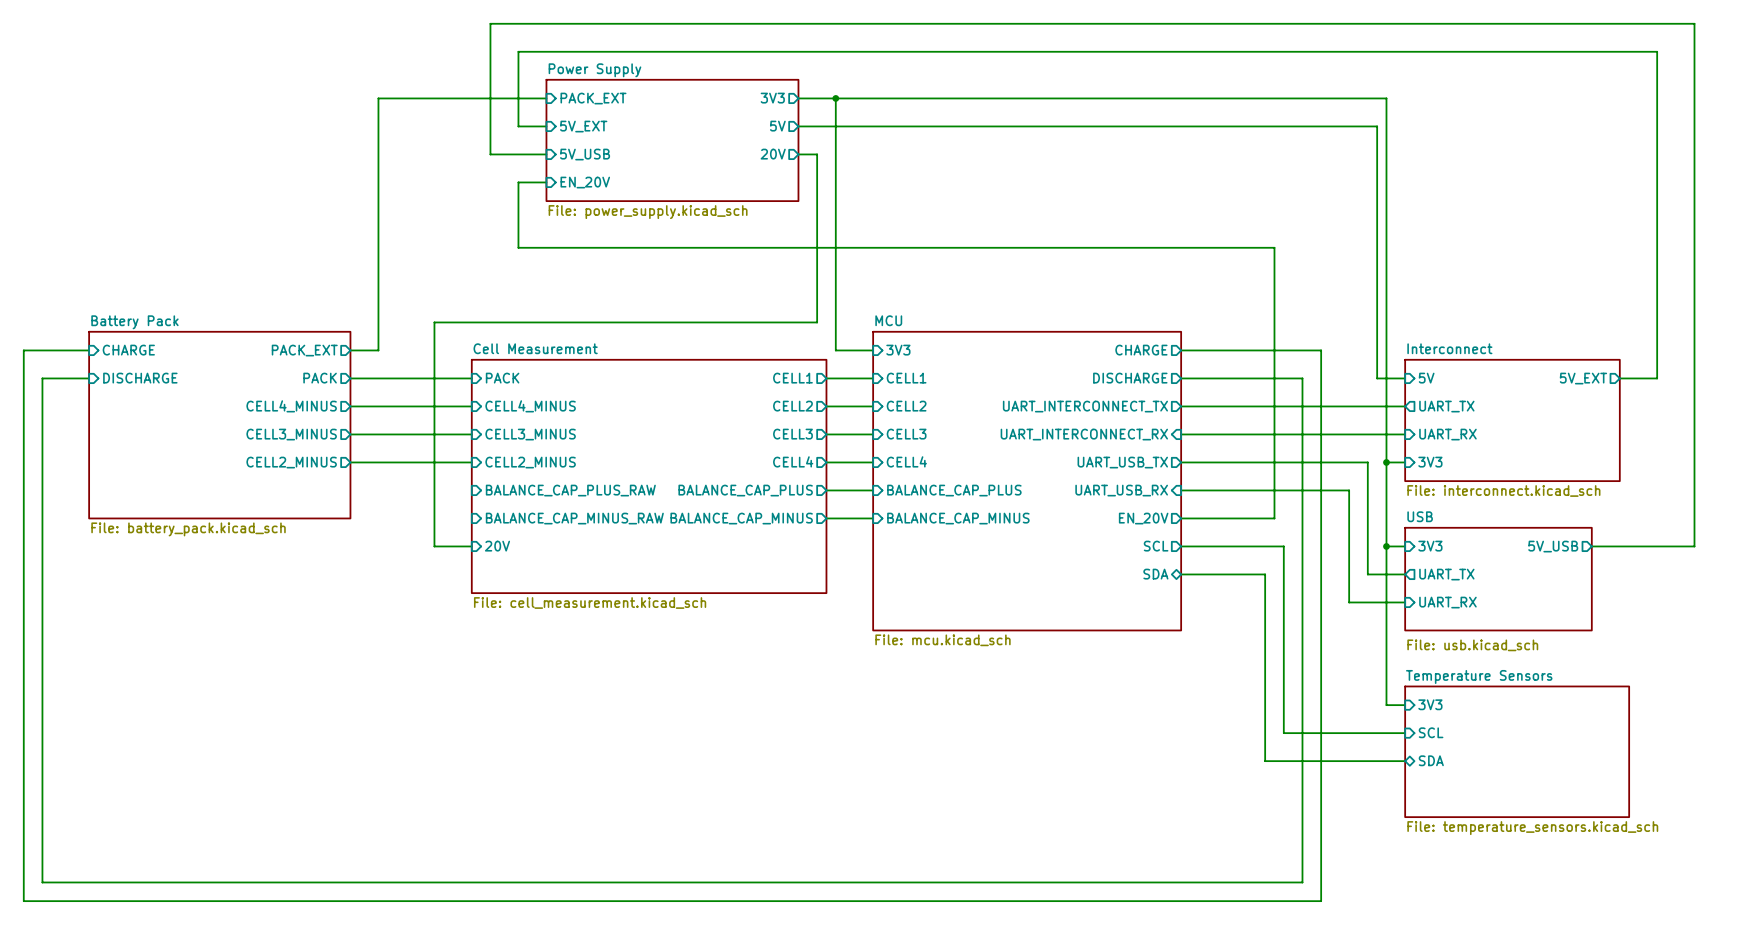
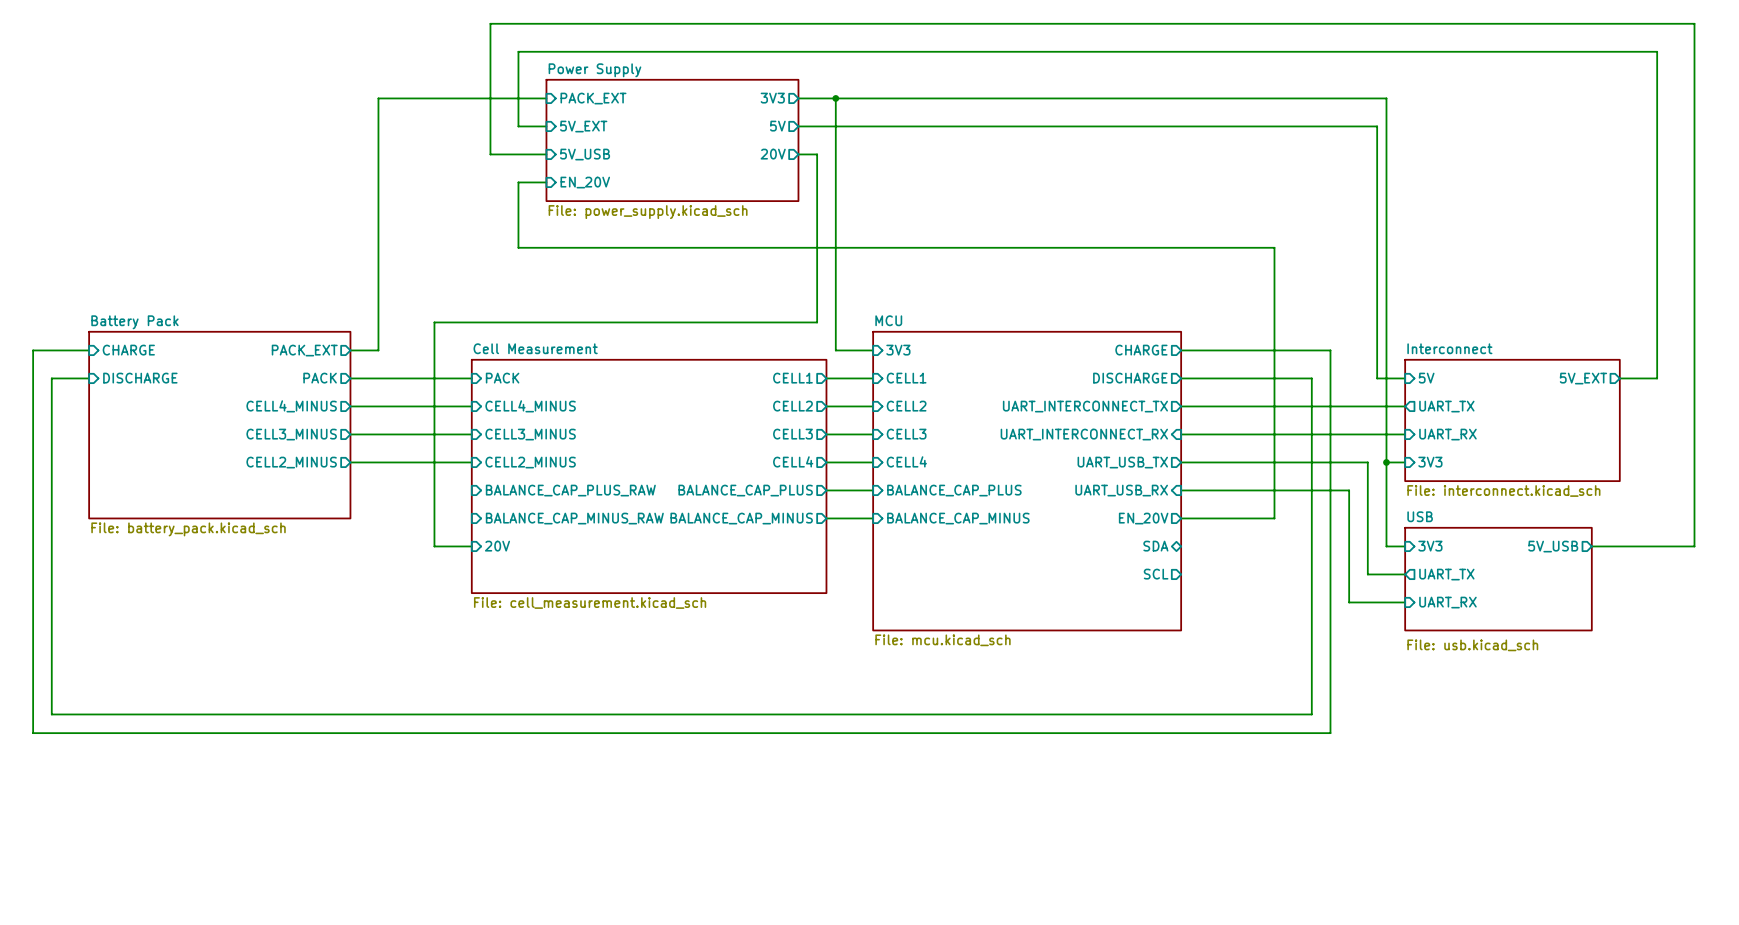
wire: (33, 350) (23, 350) (23, 901) (1321, 901) (1321, 350) -> (33, 350) (33, 733) (1283, 733)
wire: (51, 378) (42, 378) (42, 882) (1302, 882) (1302, 378) -> (51, 378) (51, 714) (1311, 714) (1311, 378) (1302, 378)
sheet pin shape: output (1156, 546) -> bidirectional (1155, 546)
sheet pin: SCL (1156, 546) -> SDA (1155, 546)
wire: (1181, 546) (1283, 546) (1283, 733) -> none
wire: (1386, 546) (1386, 705) (1405, 705) -> none
junction: (1386, 546) -> none
sheet pin shape: bidirectional (1155, 574) -> output (1156, 574)
sheet pin: SDA (1155, 574) -> SCL (1156, 574)
wire: (1181, 574) (1265, 574) (1265, 761) (1405, 761) -> none
sheet pin: 3V3 (1430, 704) -> none
sheet pin: SCL (1431, 732) -> none
wire: (1330, 733) (1405, 733) -> (1330, 733) (1330, 350) (1321, 350)
sheet Temperature Sensors: File: temperature_sensors.kicad_sch (1517, 751) -> none
sheet pin: SDA (1431, 760) -> none

